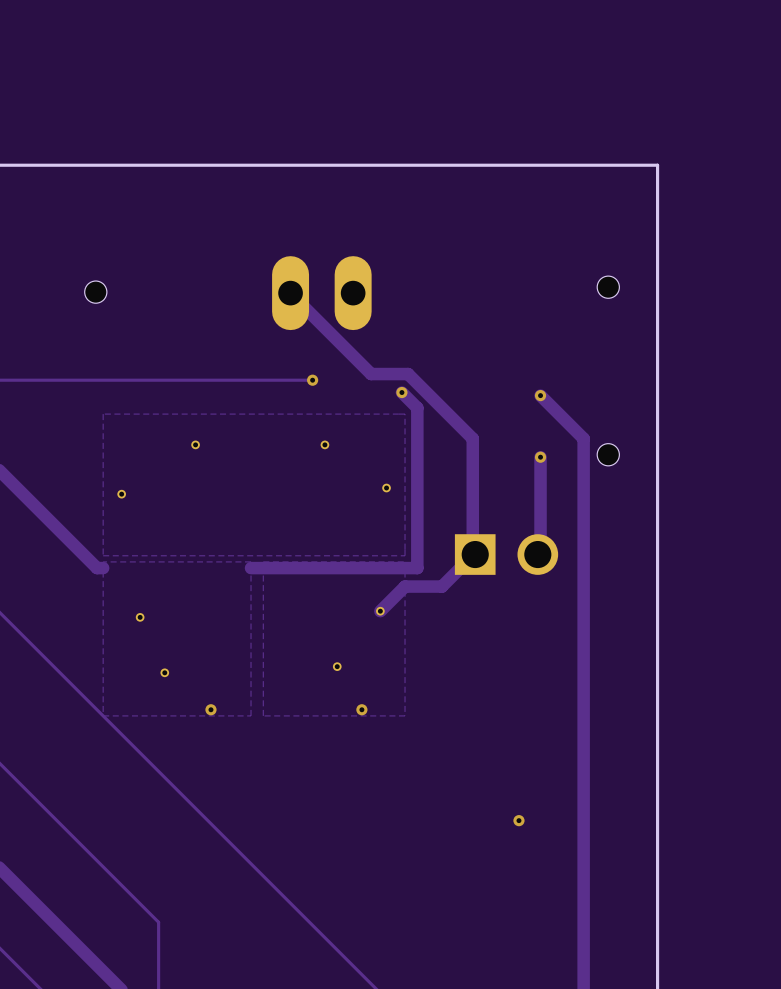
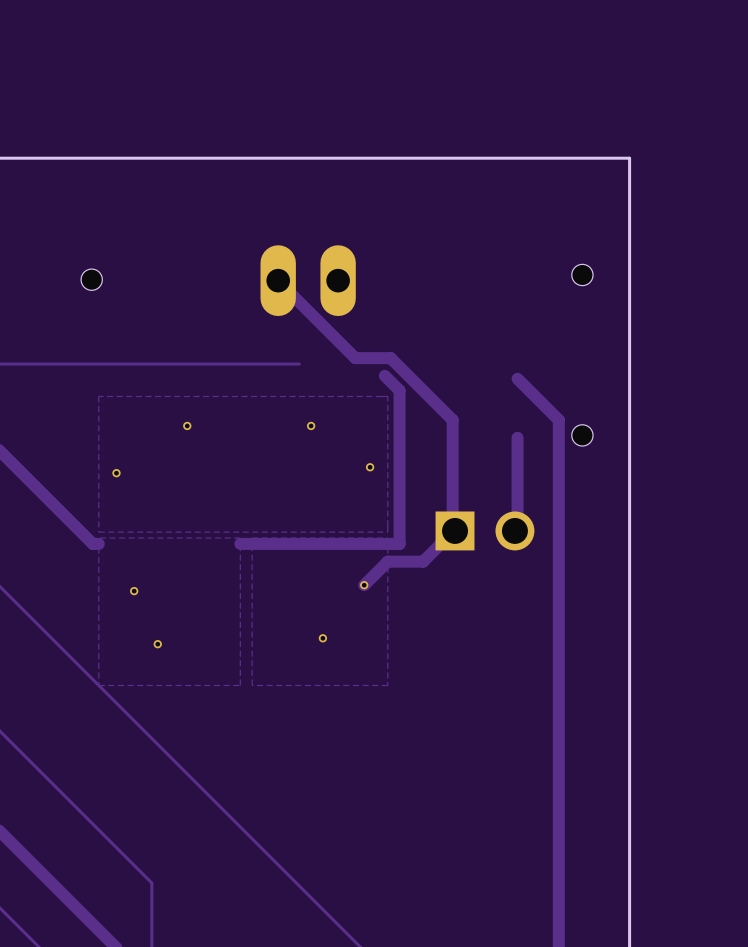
via: (312, 380) -> none
via: (401, 392) -> none
via: (540, 395) -> none
via: (540, 457) -> none
via: (210, 709) -> none
via: (361, 709) -> none
via: (518, 820) -> none

